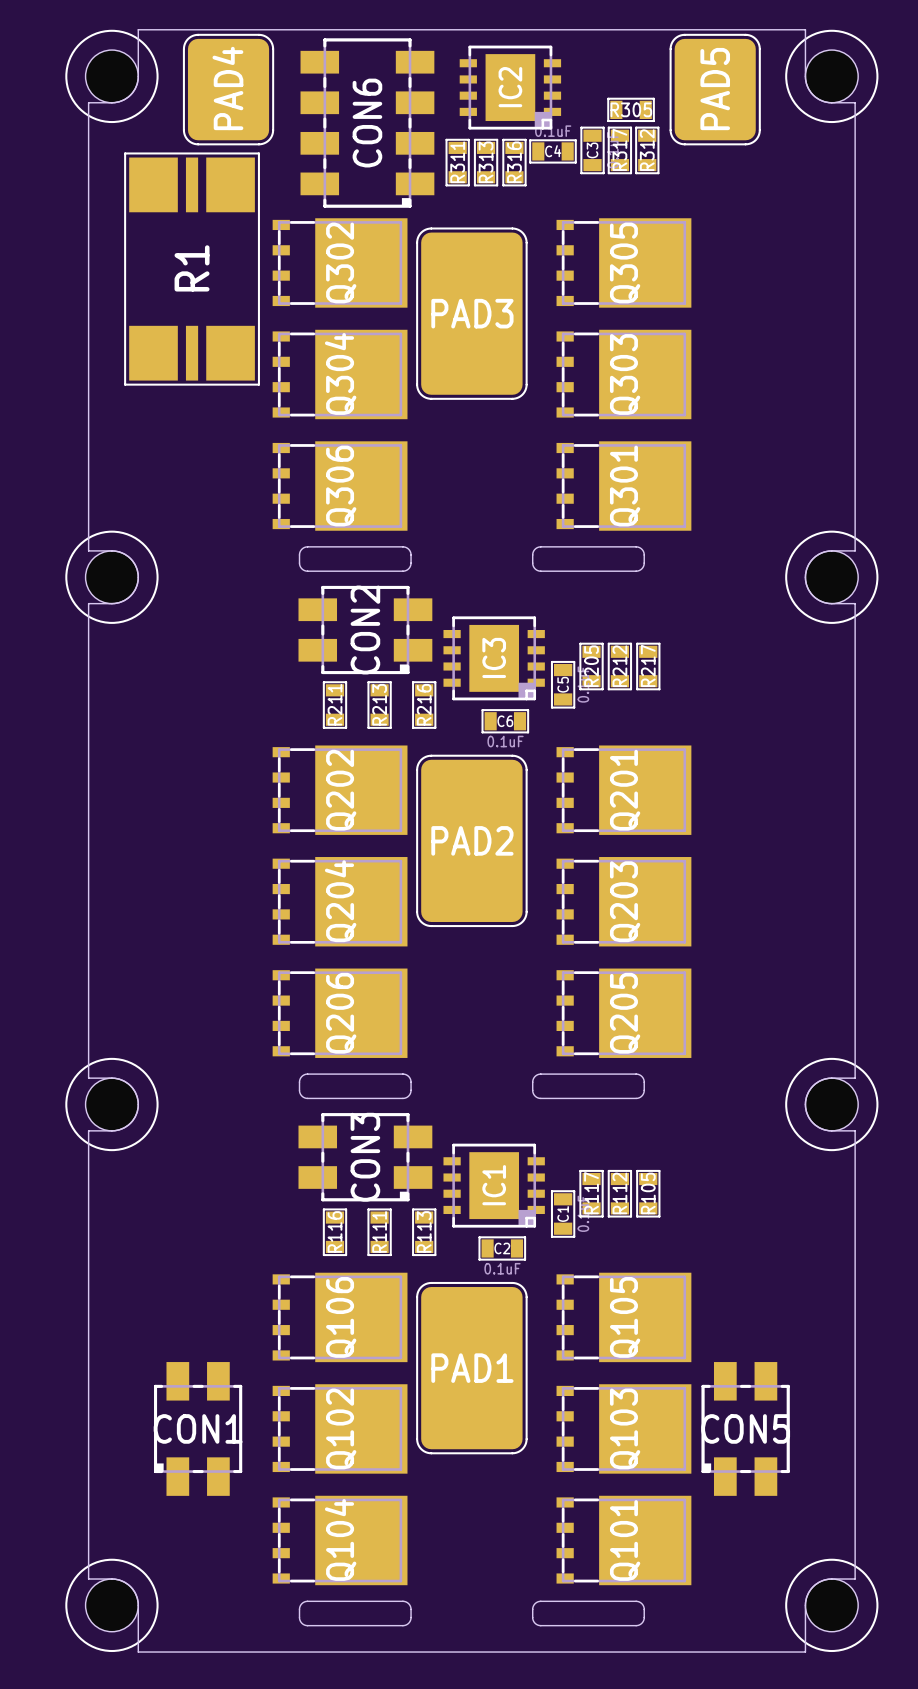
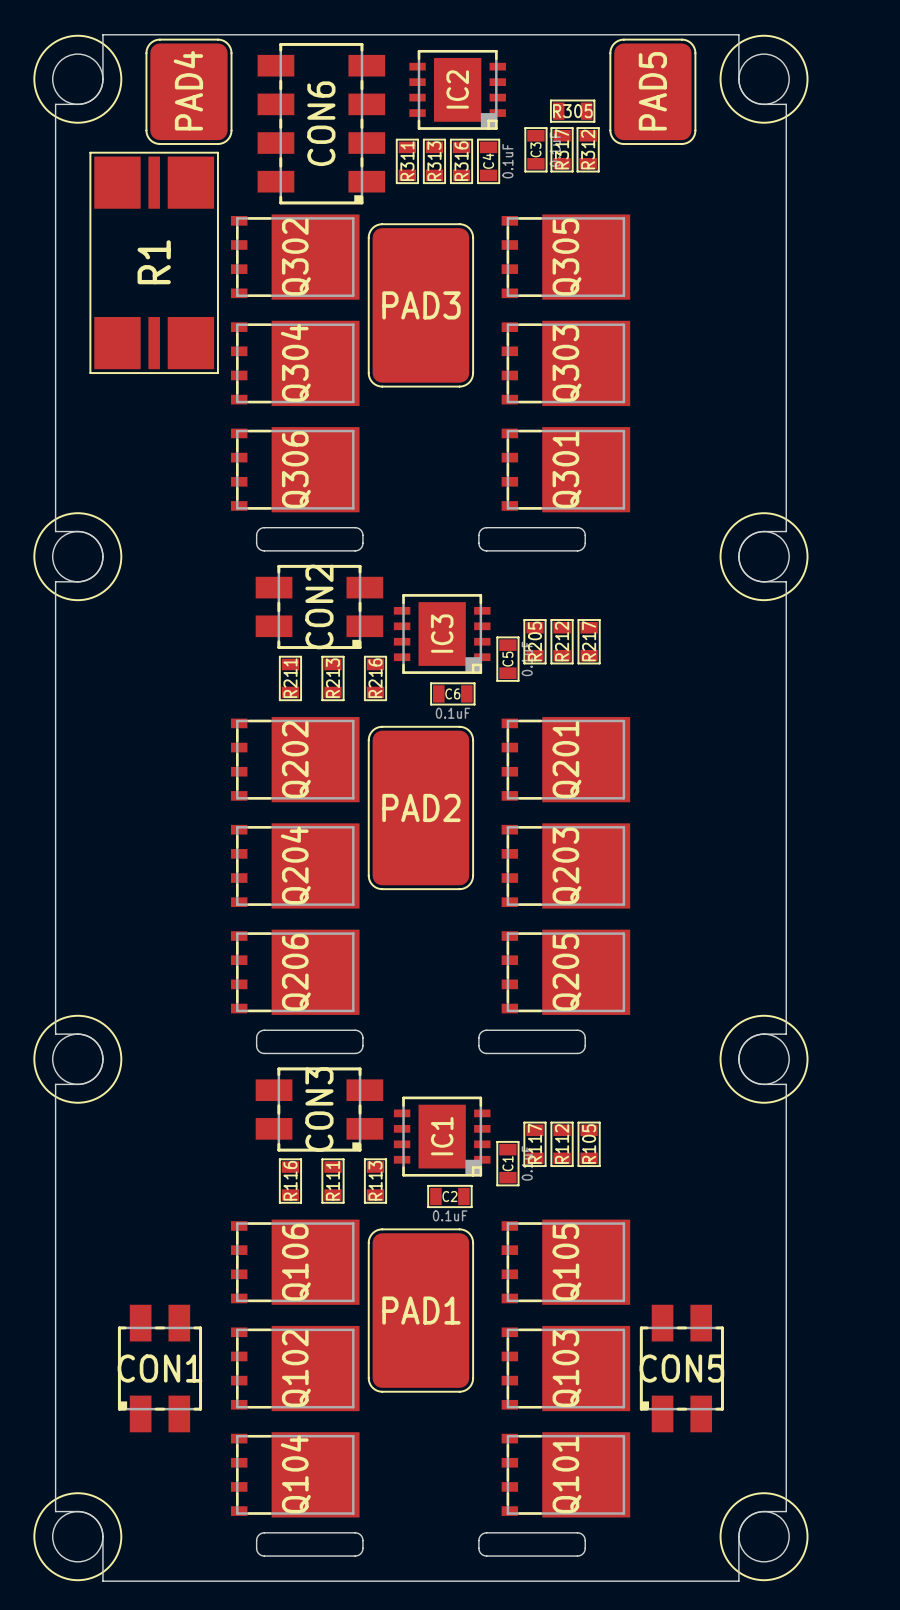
C4 rotation: 0° (552, 151) -> 90° clockwise (488, 161)

